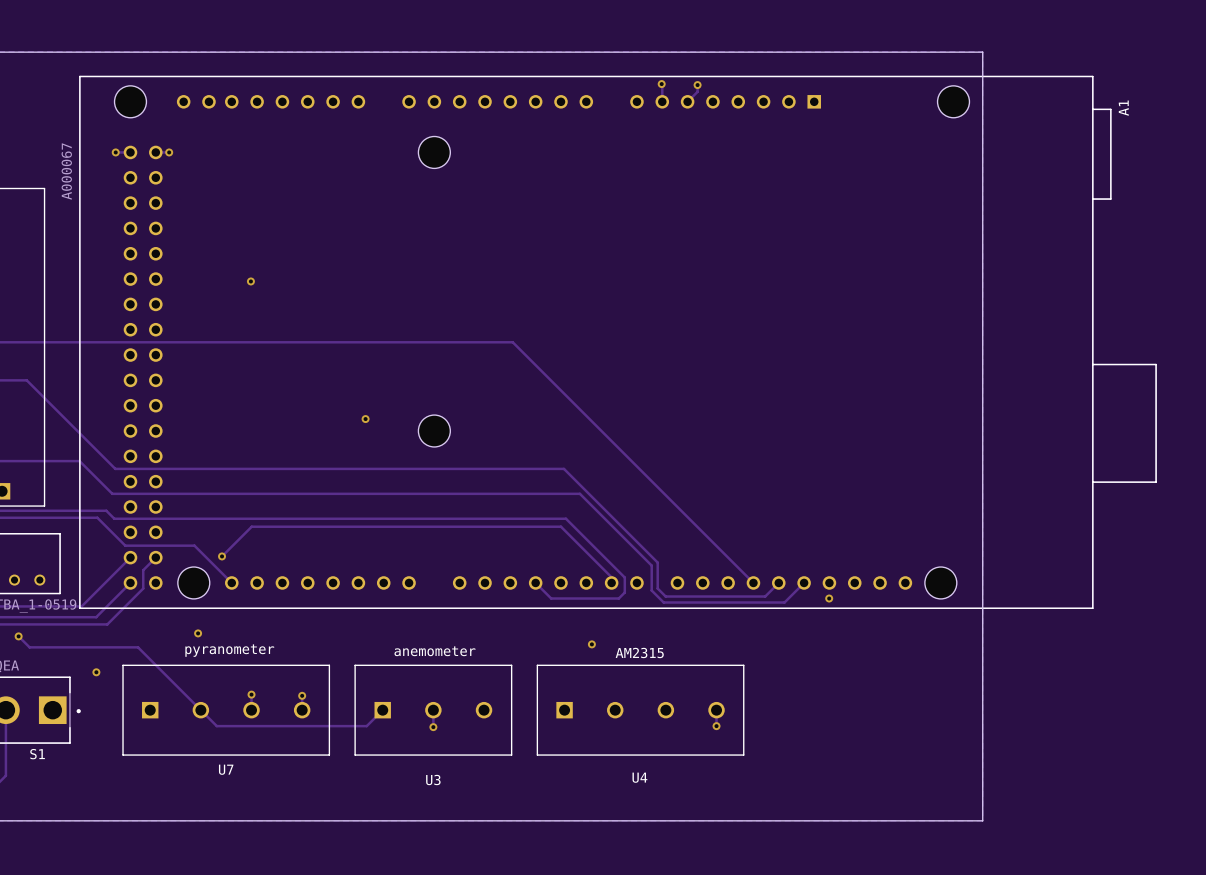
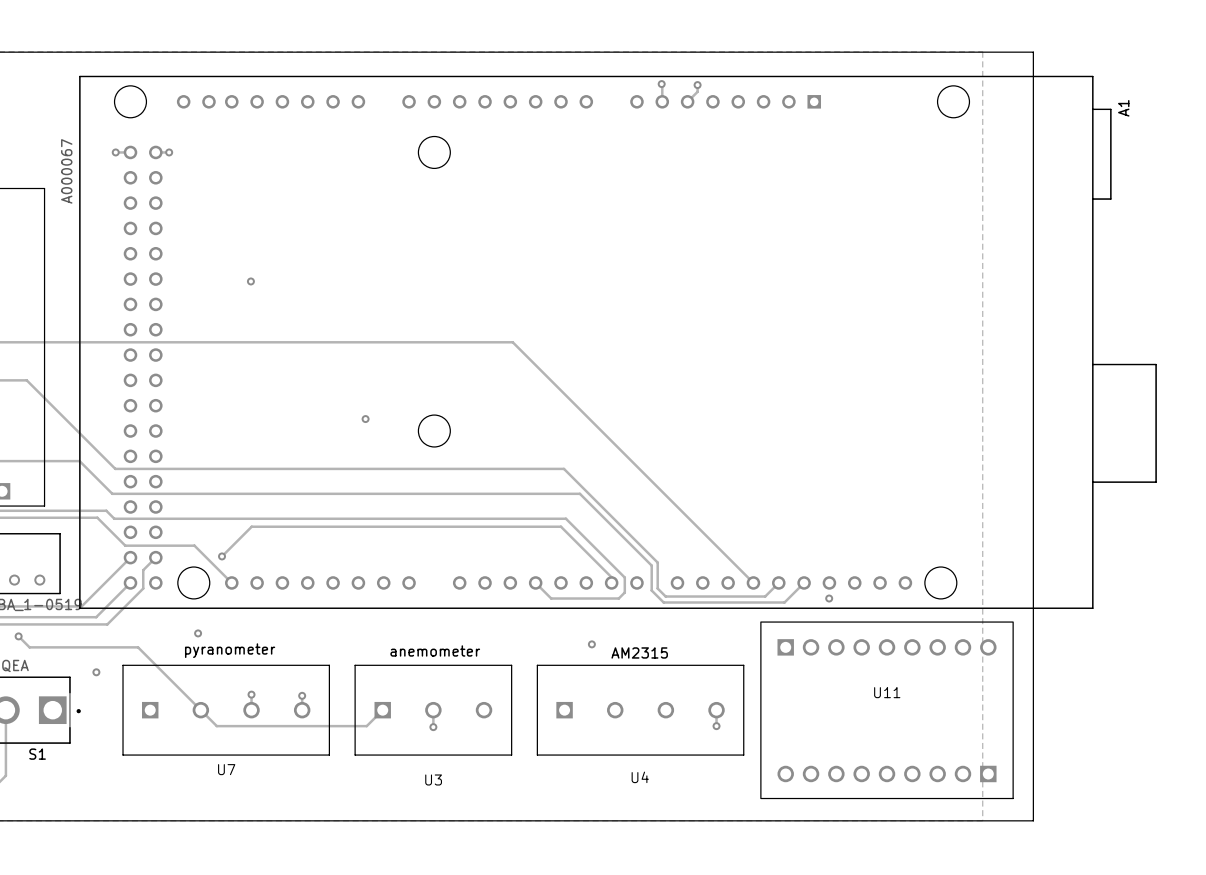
board edge: (982, 52) (982, 820) -> (982, 52) (1033, 52) (1033, 820) (982, 820)
U11: none -> (887, 710)

